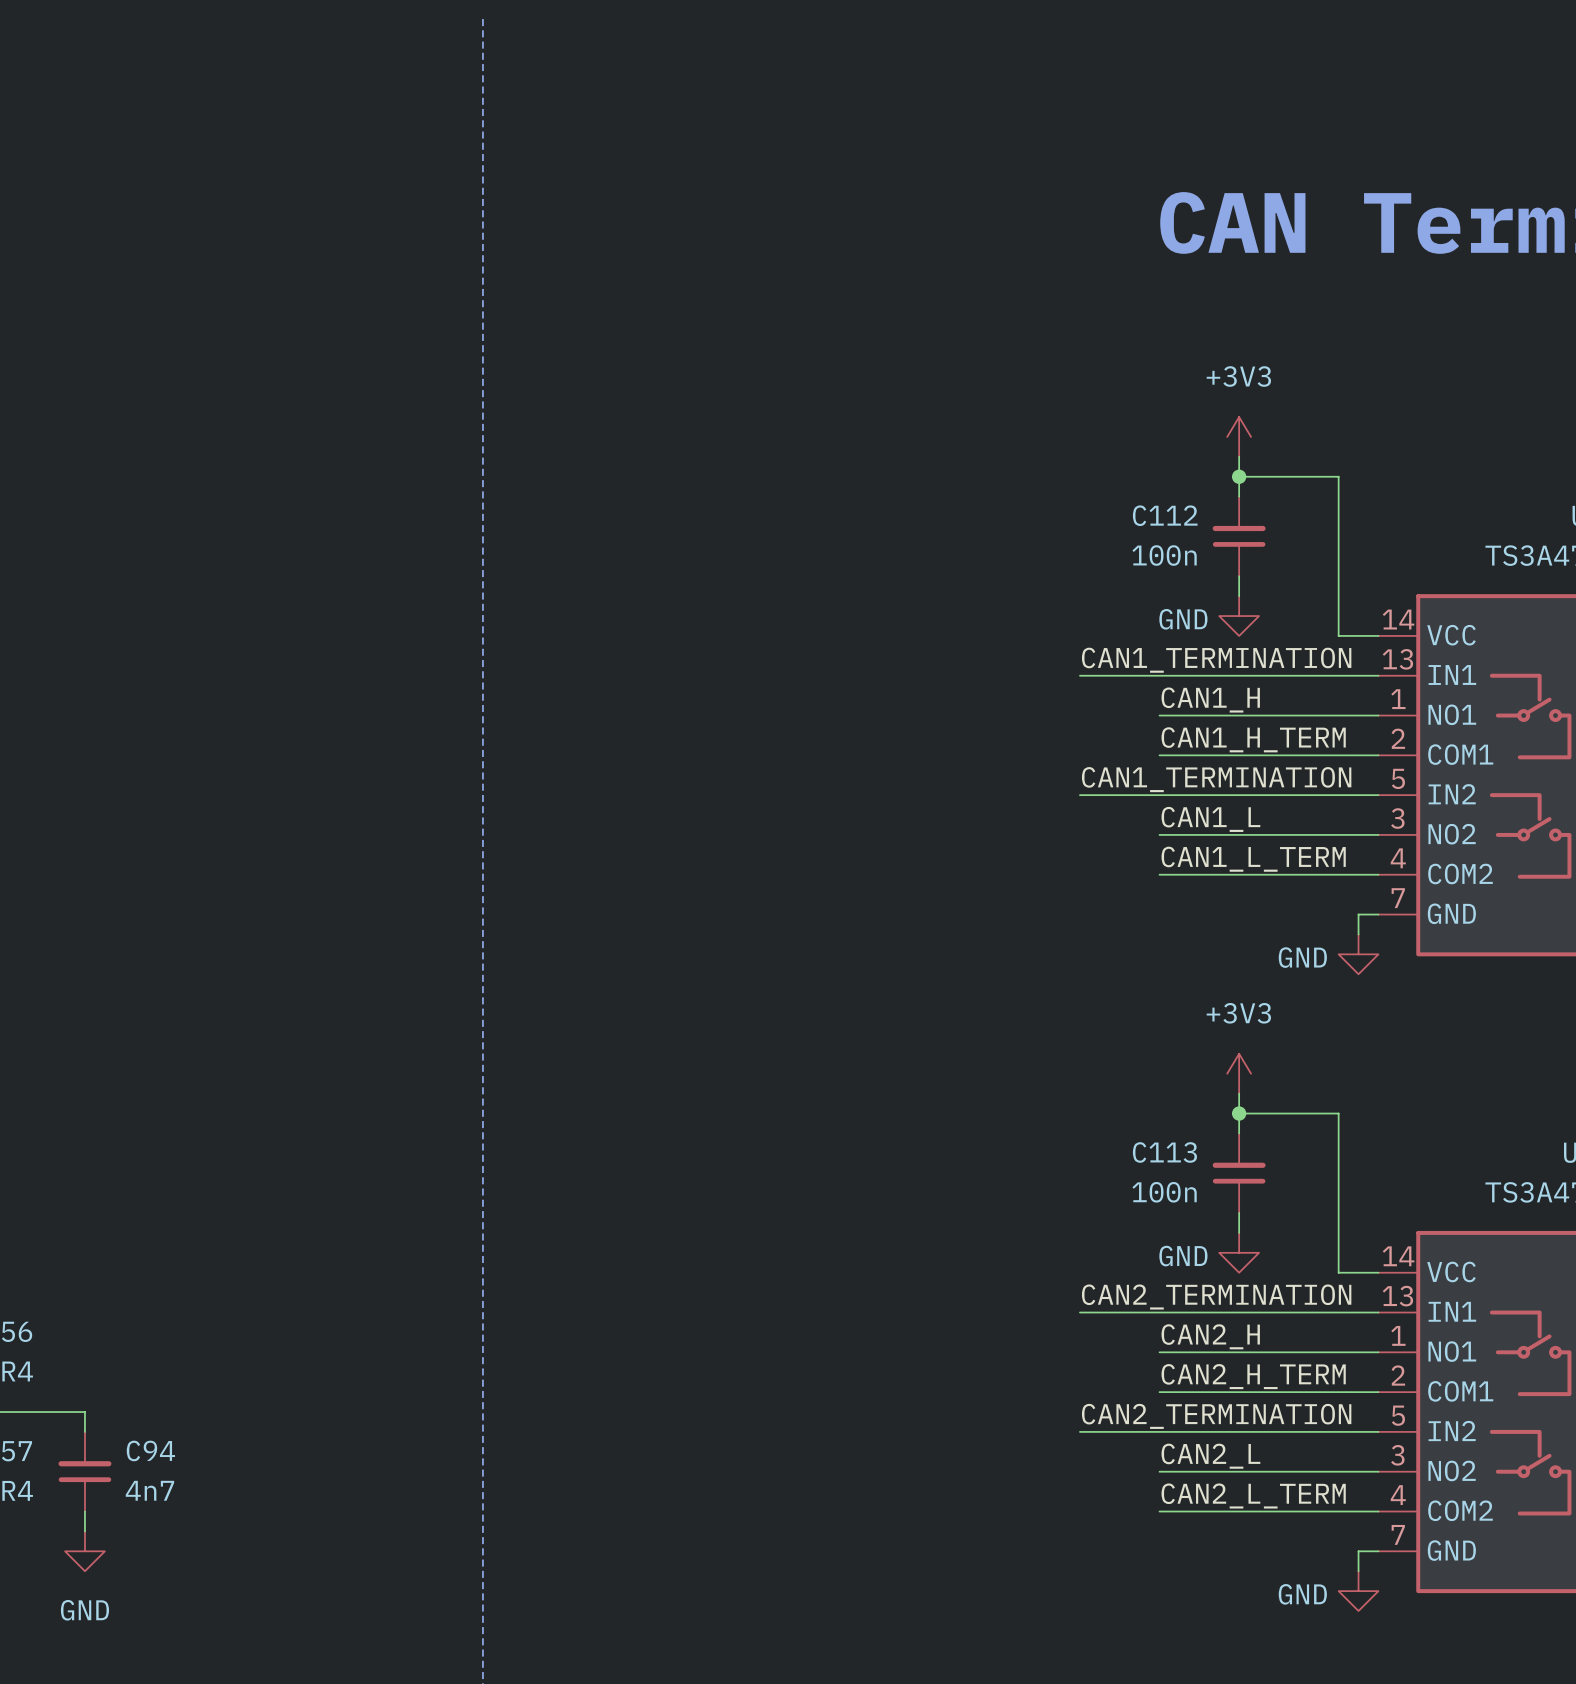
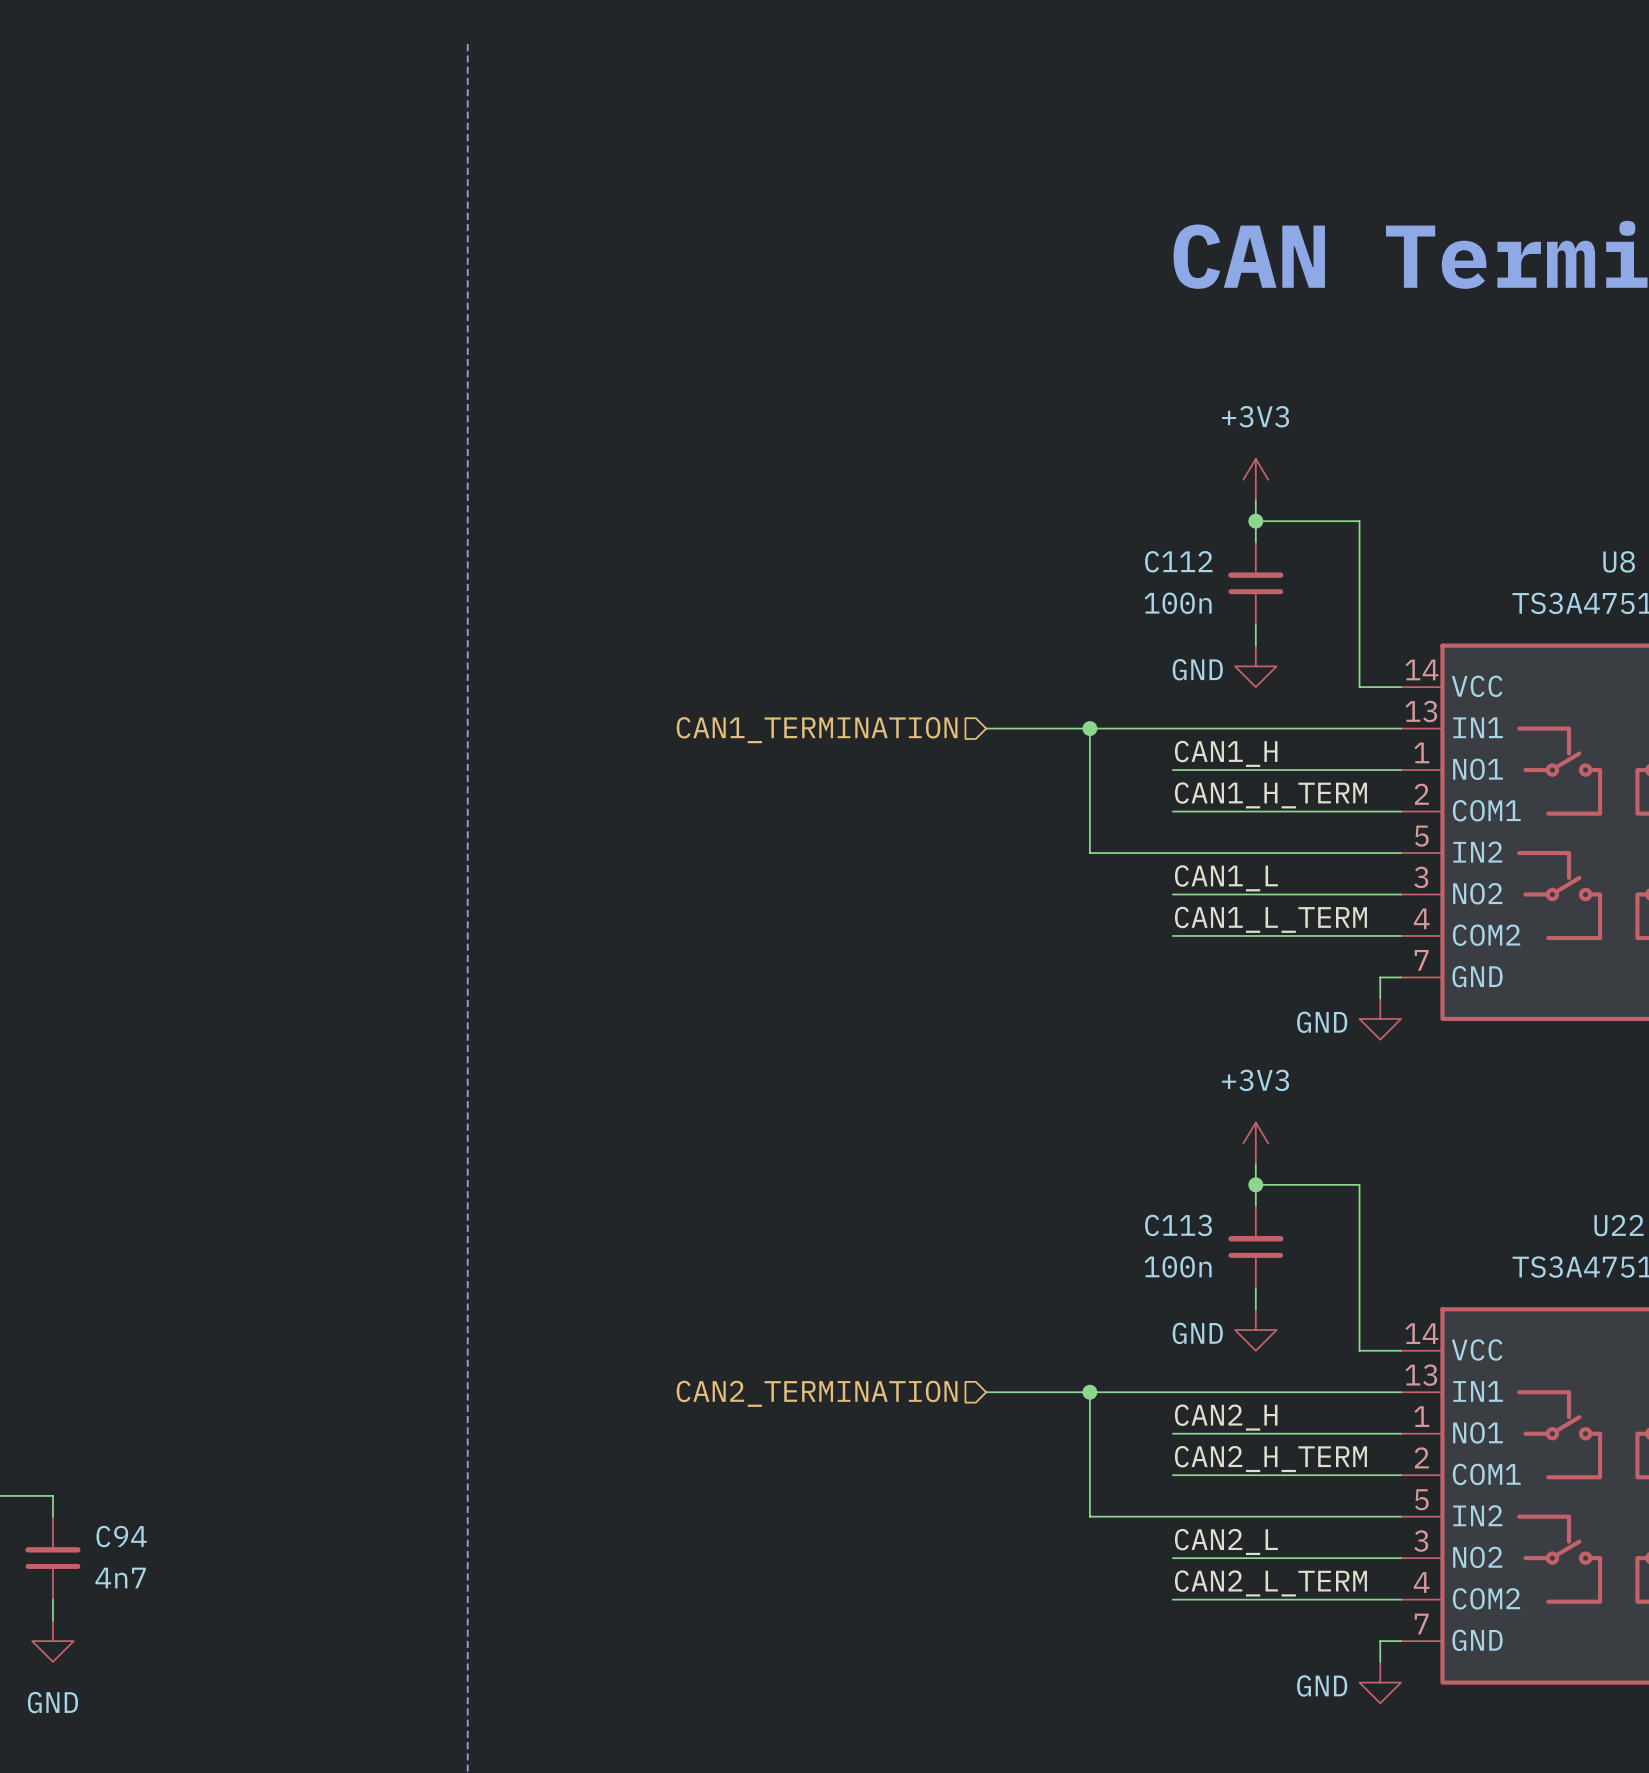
label: CAN1_TERMINATION (1216, 660) -> none
wire: none -> (986, 728) (1089, 728) (1089, 853)
junction: none -> (1089, 728)
hierarchical label: none -> CAN1_TERMINATION (817, 730)
label: CAN1_TERMINATION (1216, 779) -> none
label: CAN2_TERMINATION (1216, 1297) -> none
wire: none -> (986, 1392) (1089, 1392) (1089, 1516)
junction: none -> (1089, 1392)
hierarchical label: none -> CAN2_TERMINATION (817, 1393)
label: CAN2_TERMINATION (1216, 1416) -> none

